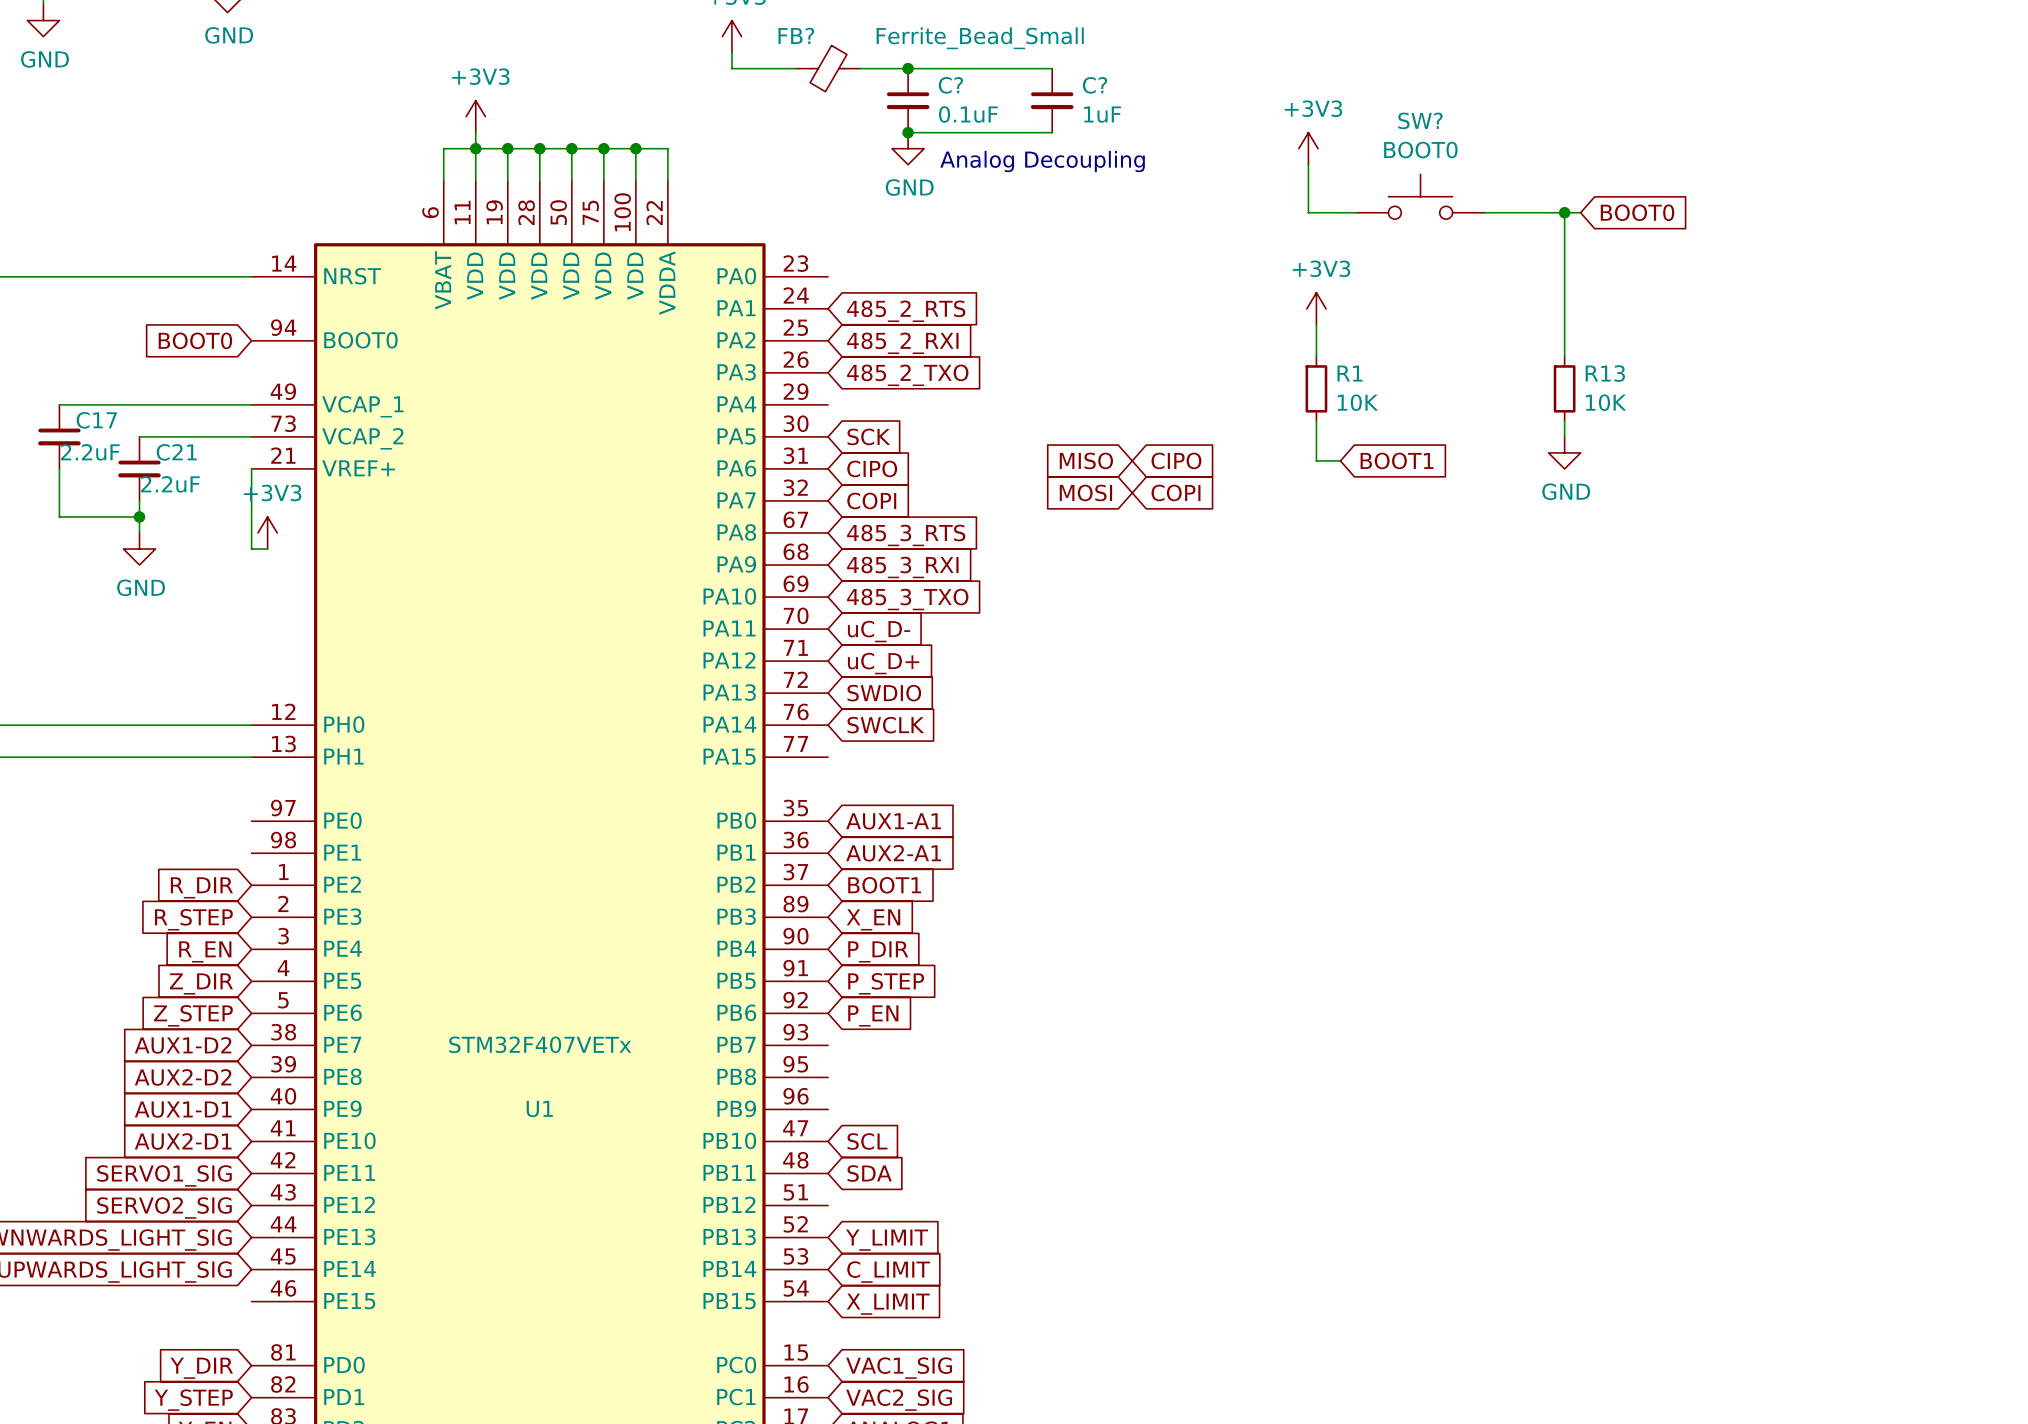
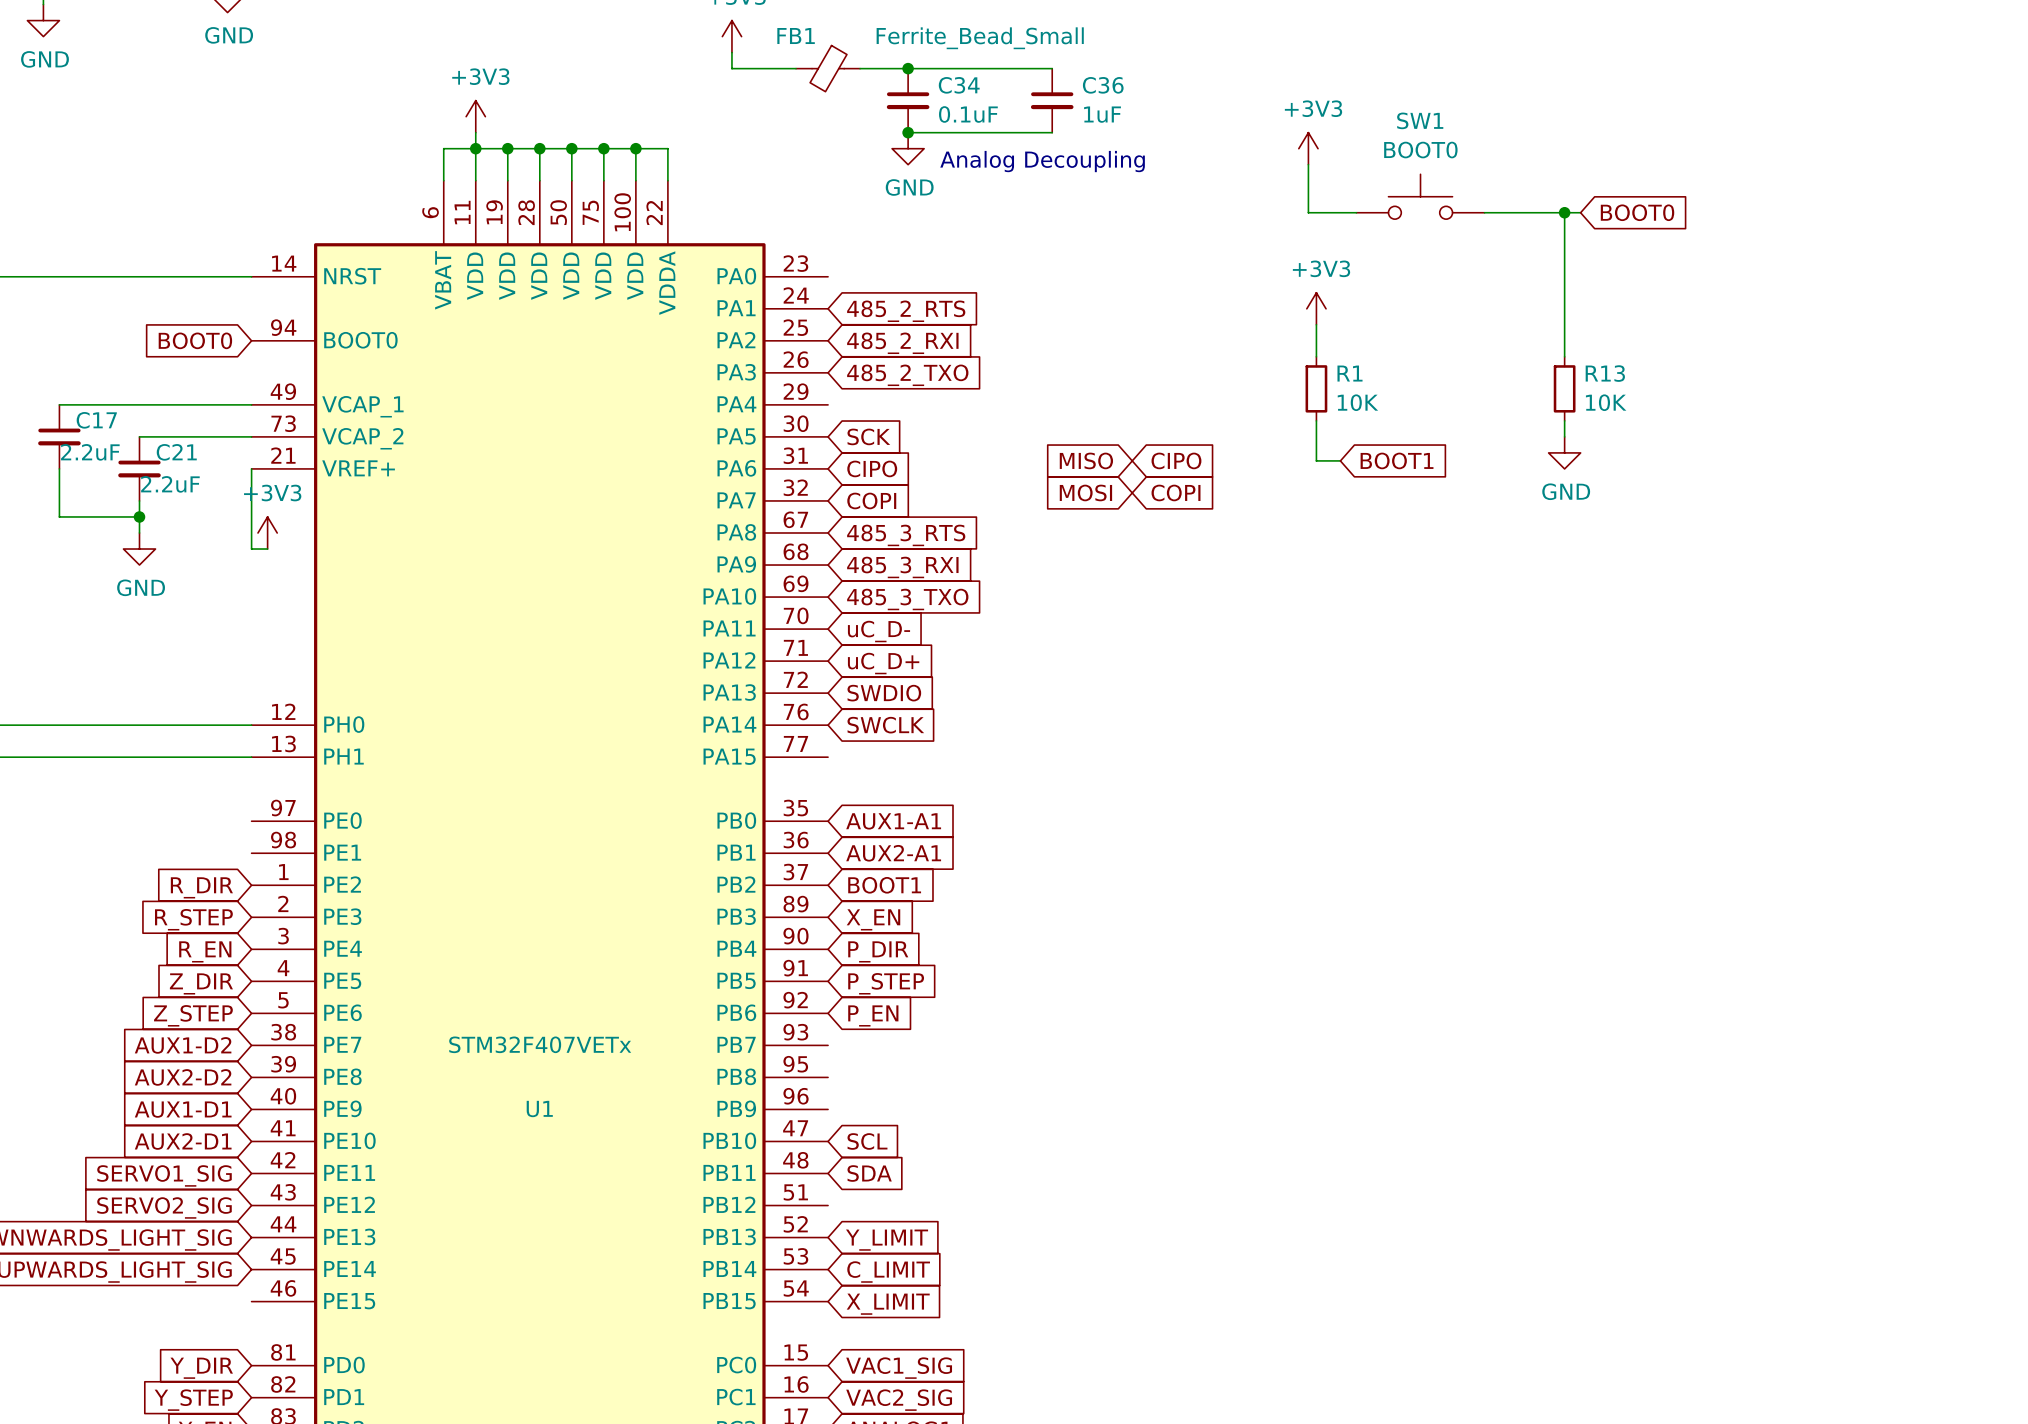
FB? name: FB? (796, 35) -> FB1 (796, 36)
C? name: C? (950, 85) -> C34 (959, 85)
C? name: C? (1095, 85) -> C36 (1103, 85)
SW? name: SW? (1420, 120) -> SW1 (1420, 120)

